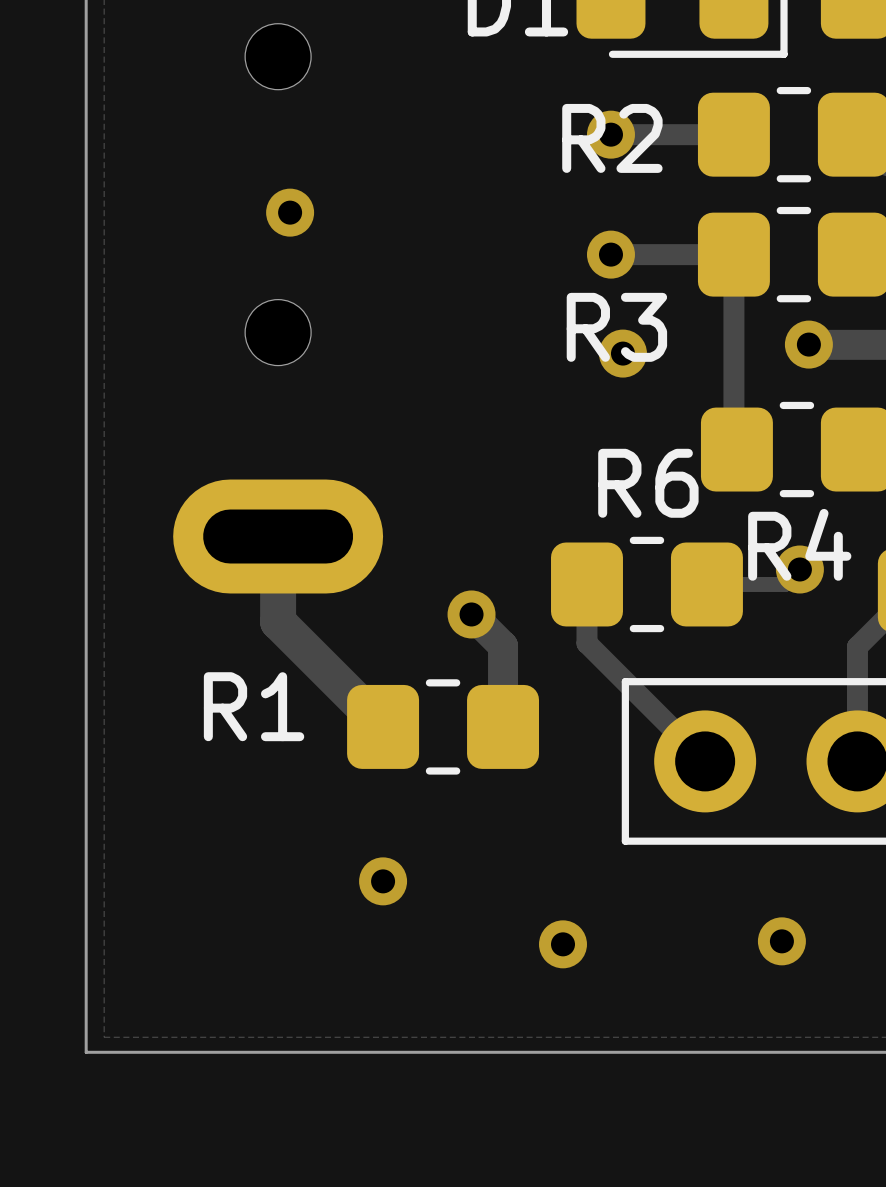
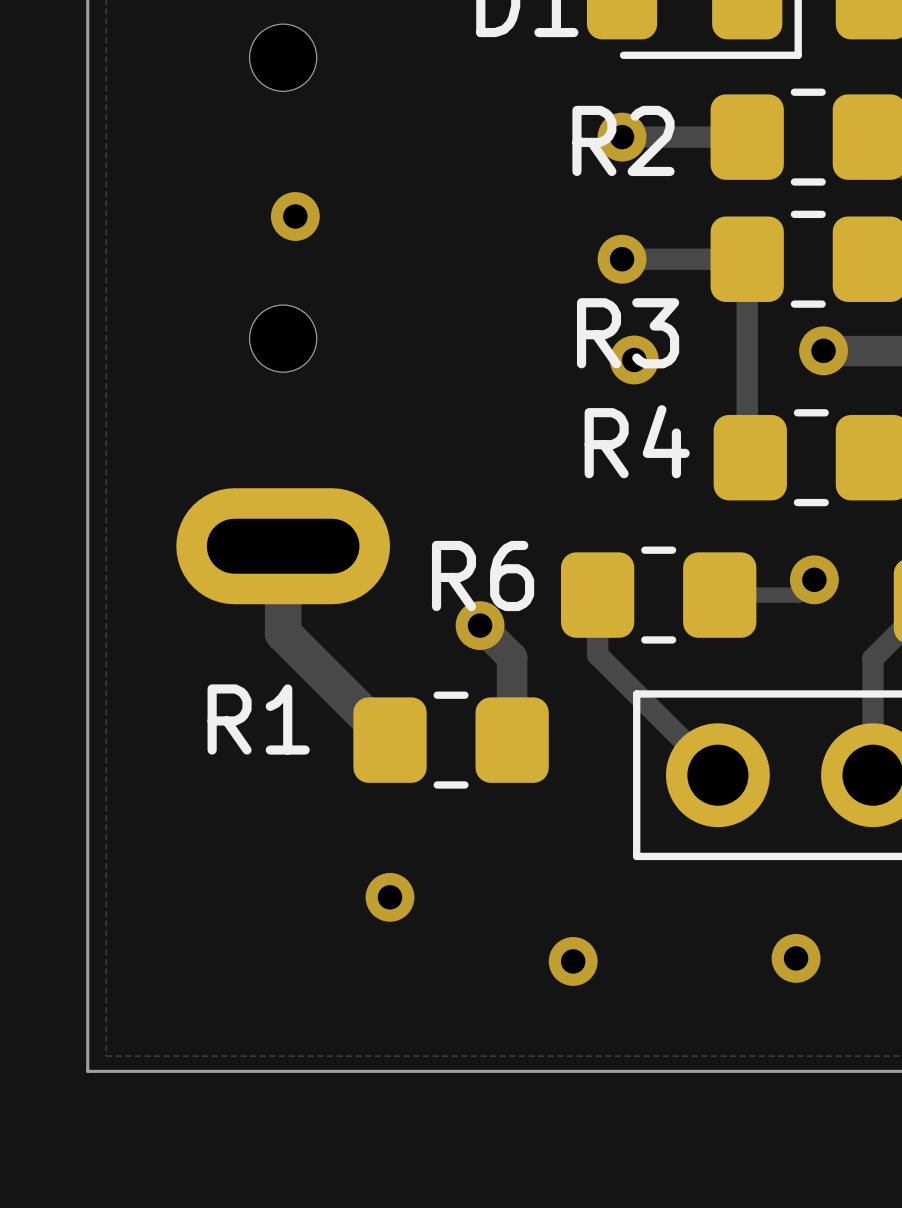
R6 name position: R6 (648, 483) -> R6 (483, 575)
R4 name position: R4 (799, 544) -> R4 (637, 441)

